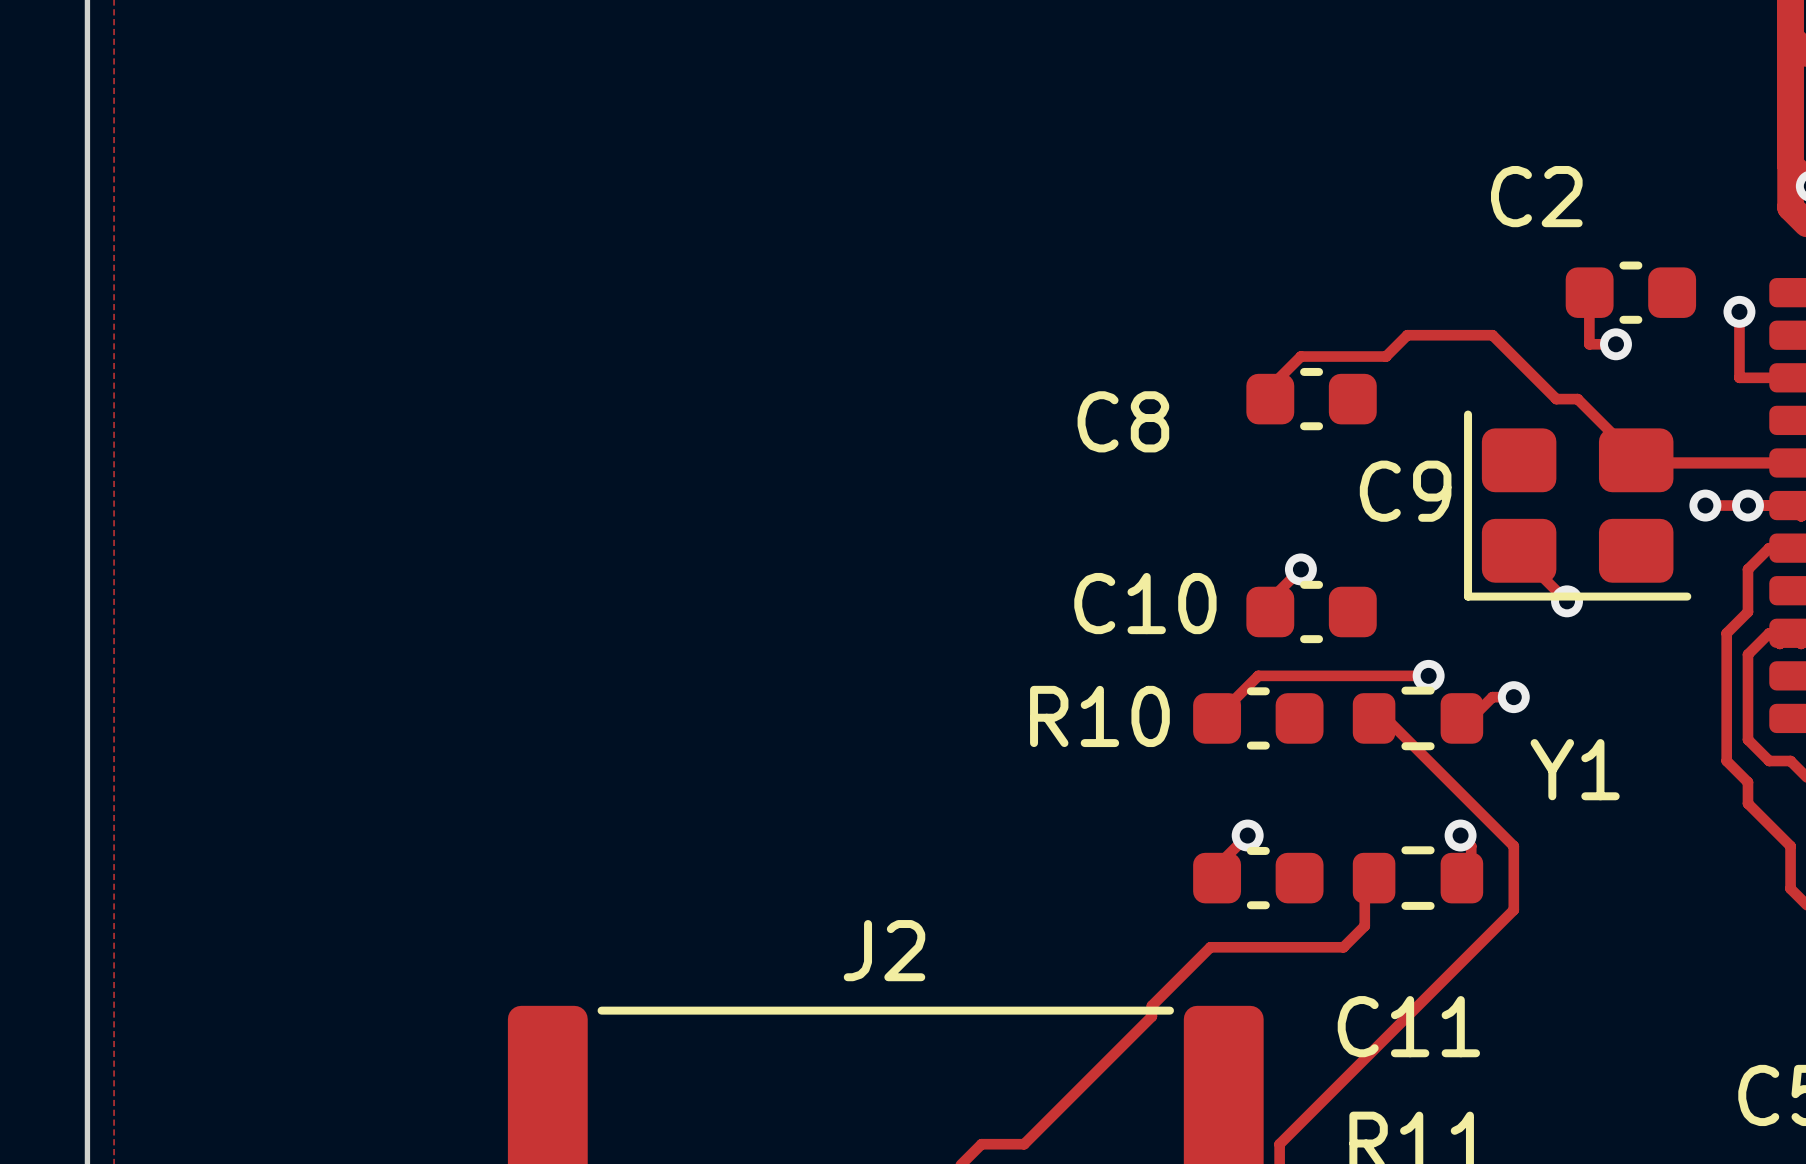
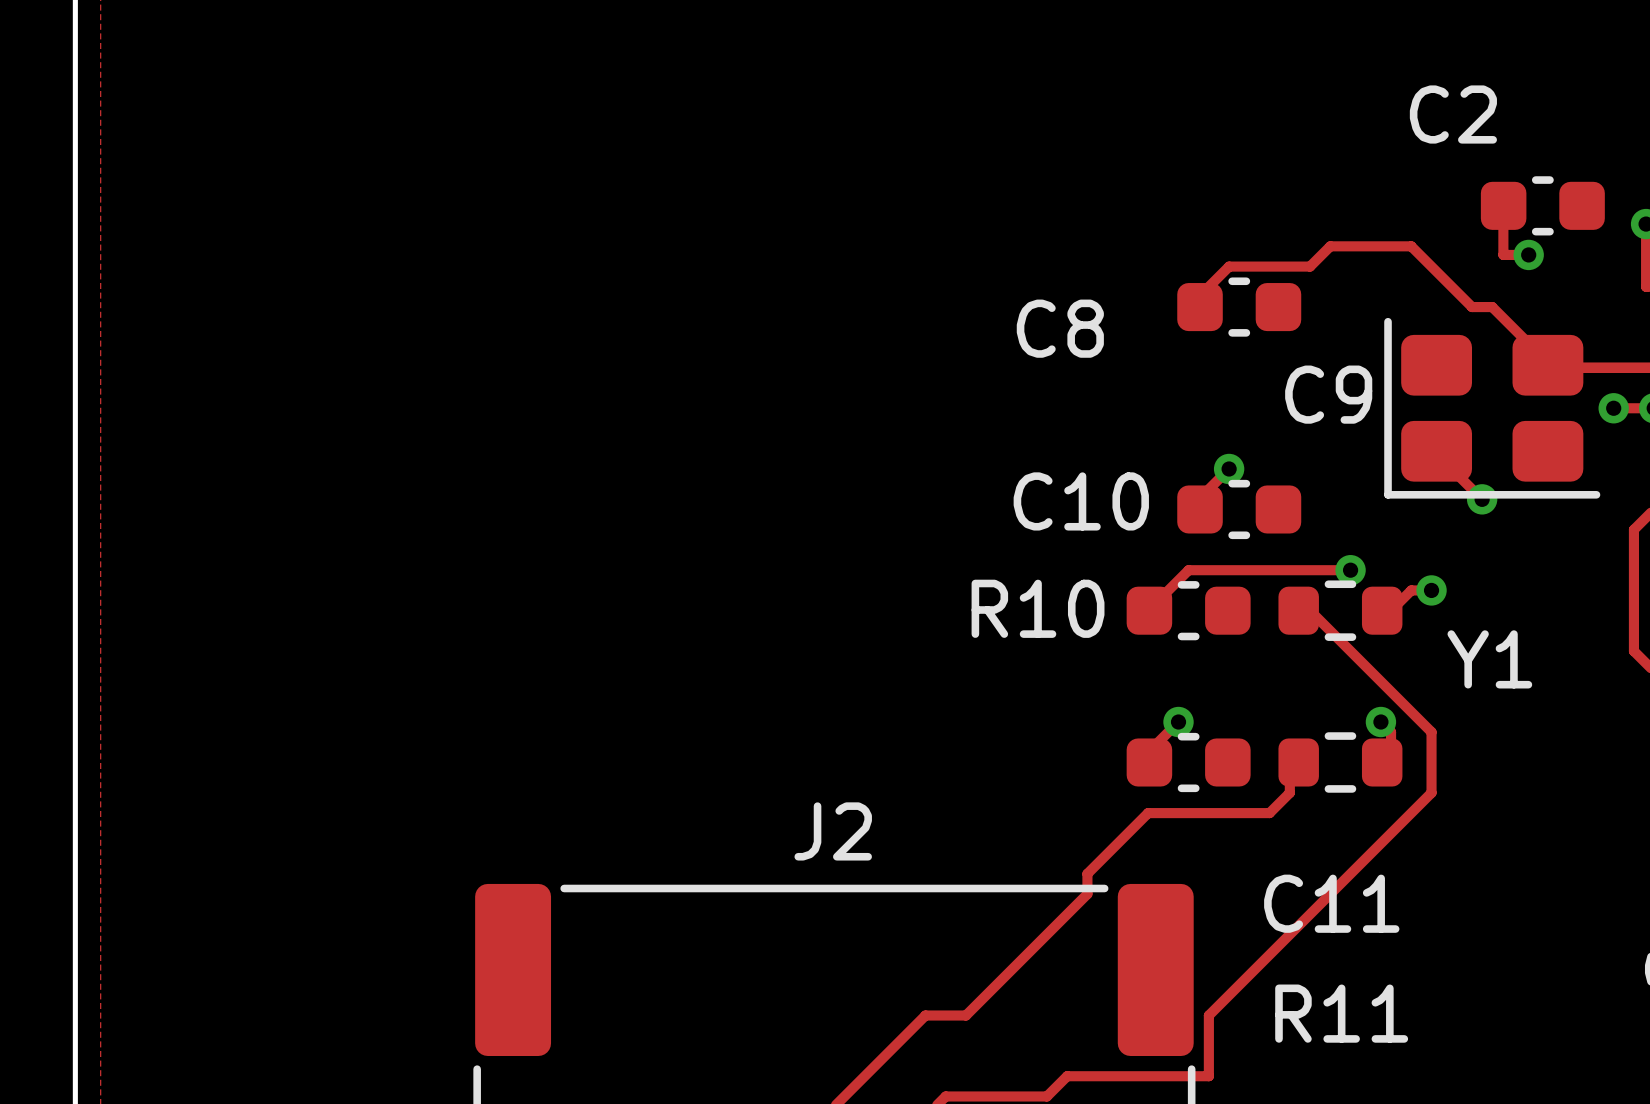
track: (1364, 910) (1364, 926) (1343, 947) (1210, 947) (1151, 1005) -> (1289, 792) (1269, 813) (1148, 813) (1087, 873) (1087, 883)

